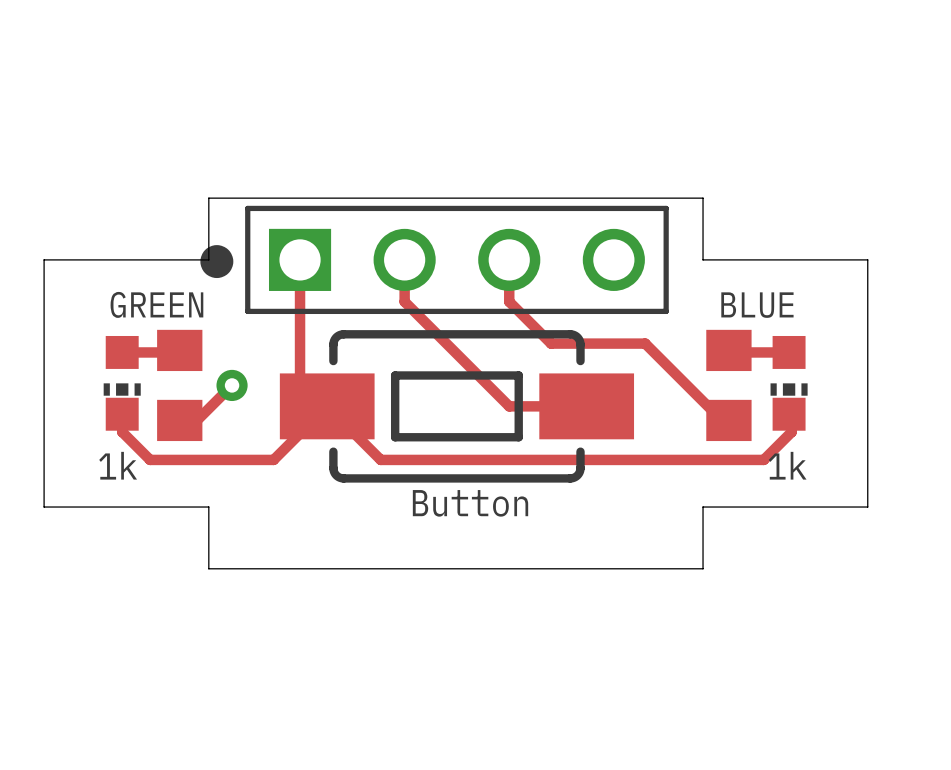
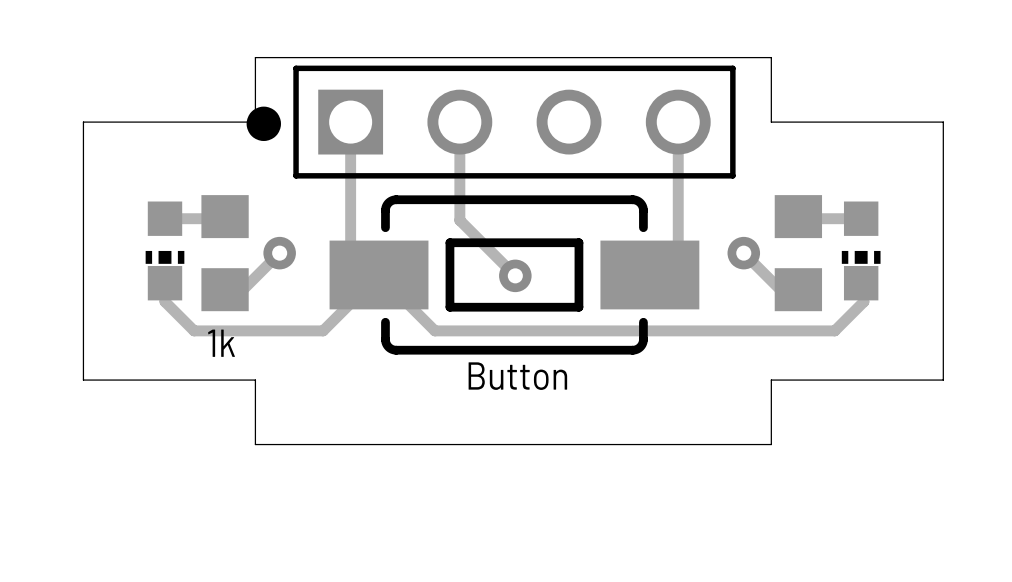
track: (509, 259) (509, 301) (551, 343) (645, 343) (722, 420) -> (743, 253) (780, 289) (791, 289)
track: none -> (678, 122) (678, 246)
track: (404, 301) (509, 406) (586, 406) -> (459, 165) (459, 220) (515, 275)
text: GREEN (156, 304) -> none
text: BLUE (757, 305) -> none
via: none -> (743, 253)
via: none -> (515, 275)
part value position: 1k (118, 465) -> 1k (221, 343)
part value: 1k (787, 465) -> none

